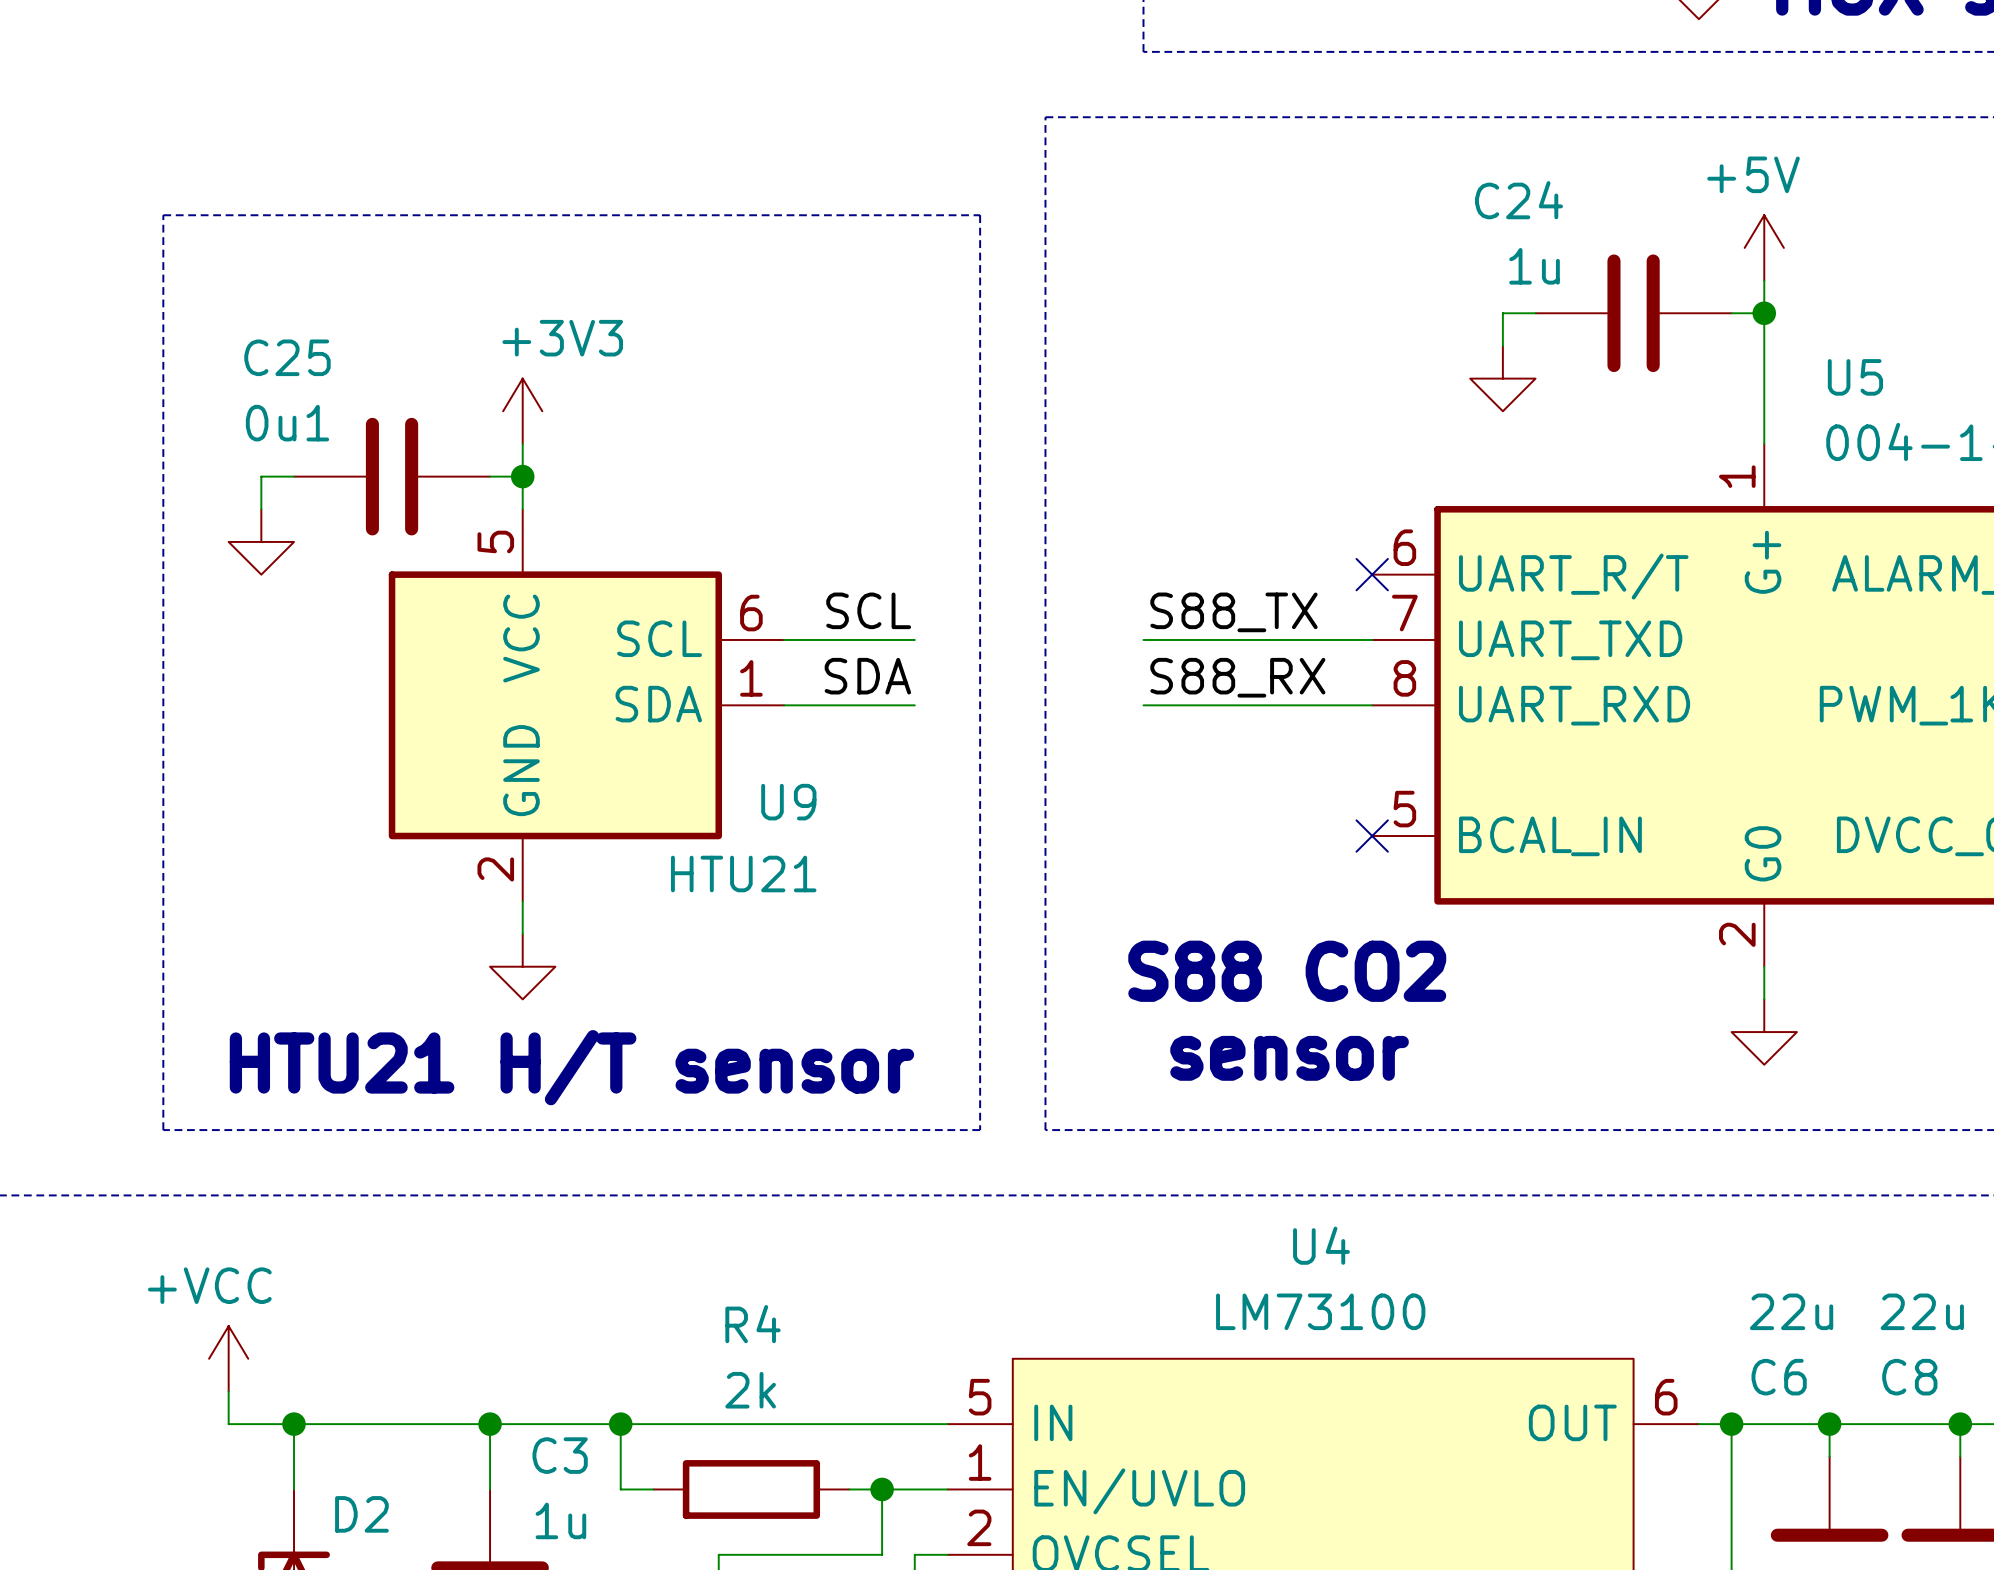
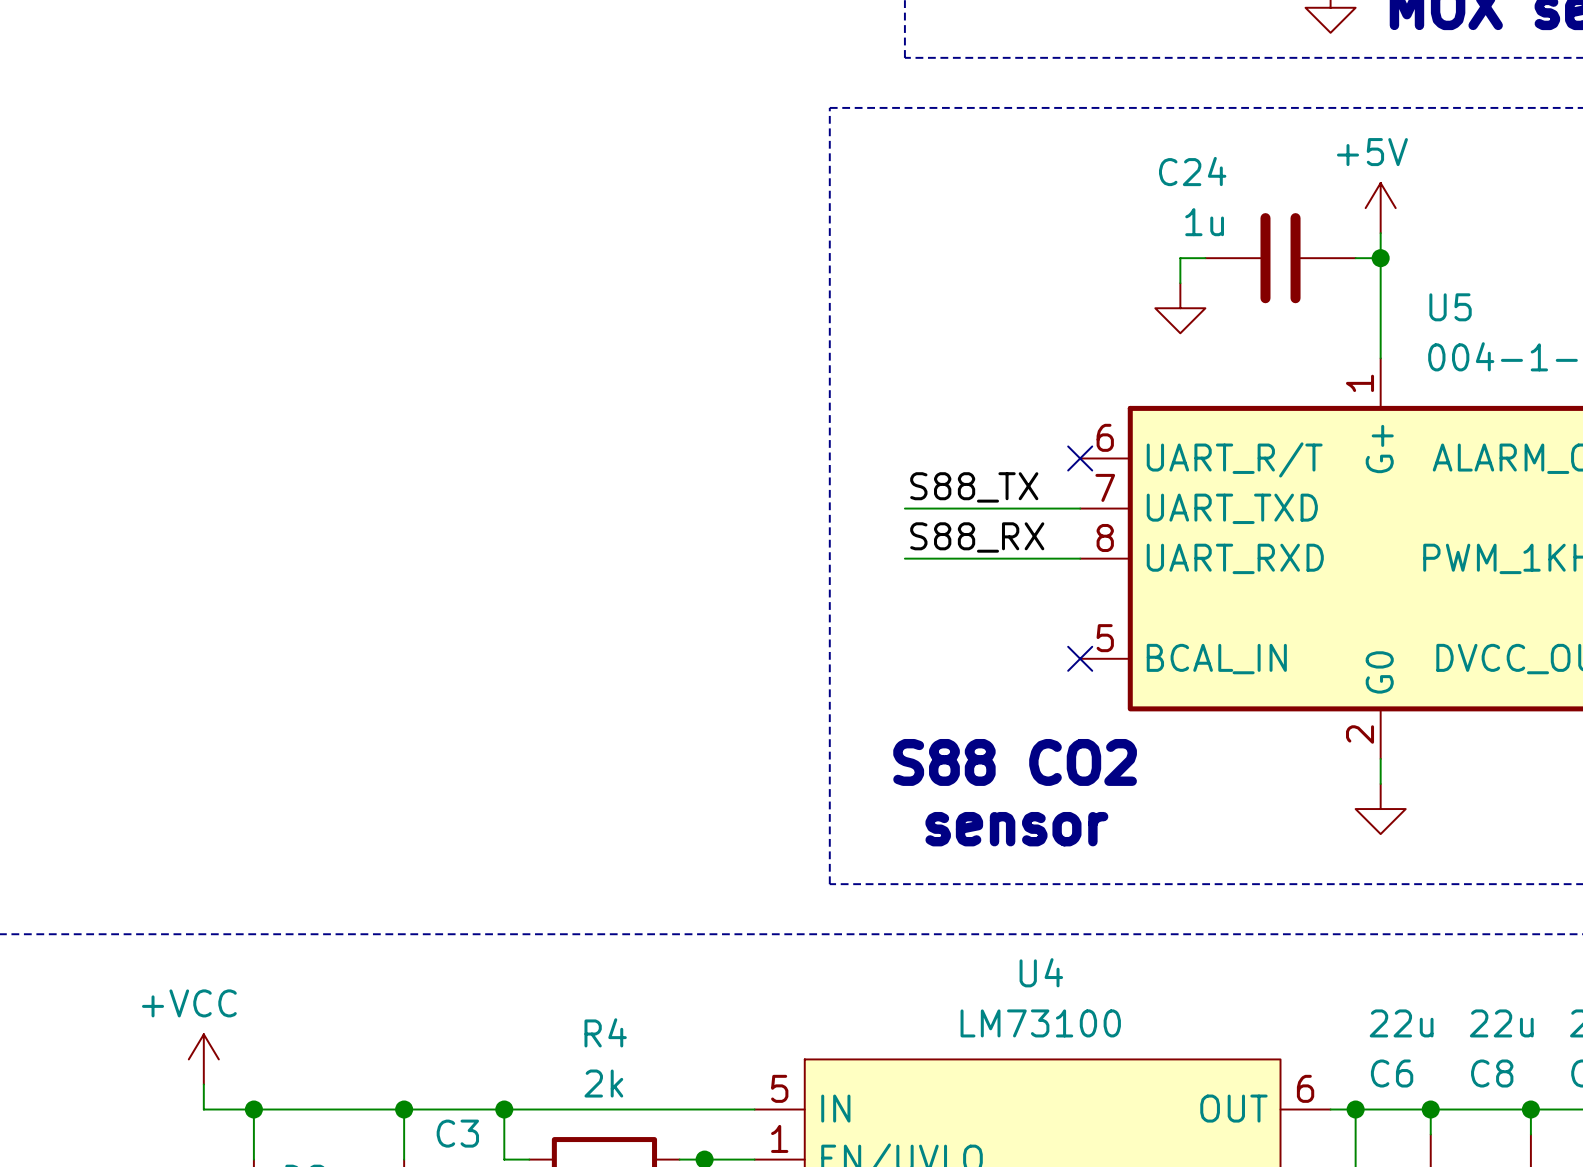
line: (163, 215) (980, 215) (980, 1130) (163, 1130) (163, 215) -> none
power symbol: +3V3 (522, 411) -> none
wire: (522, 443) (522, 509) -> none
wire: (294, 476) (261, 476) (261, 509) -> none
C25: 0u1 (392, 476) -> none
wire: (490, 476) (522, 476) -> none
junction: (522, 476) -> none
power symbol: (261, 541) -> none
label: SCL (868, 610) -> none
wire: (784, 639) (914, 639) -> none
label: SDA (867, 676) -> none
U9: HTU21 (586, 705) -> none
wire: (784, 705) (914, 705) -> none
wire: (522, 901) (522, 934) -> none
power symbol: (522, 966) -> none
text: HTU21 H/T sensor (571, 1067) -> none

